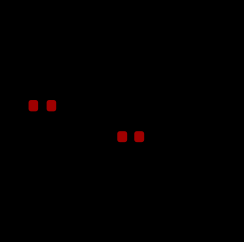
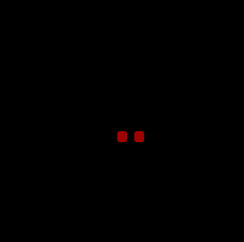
part: (42, 105) -> none

